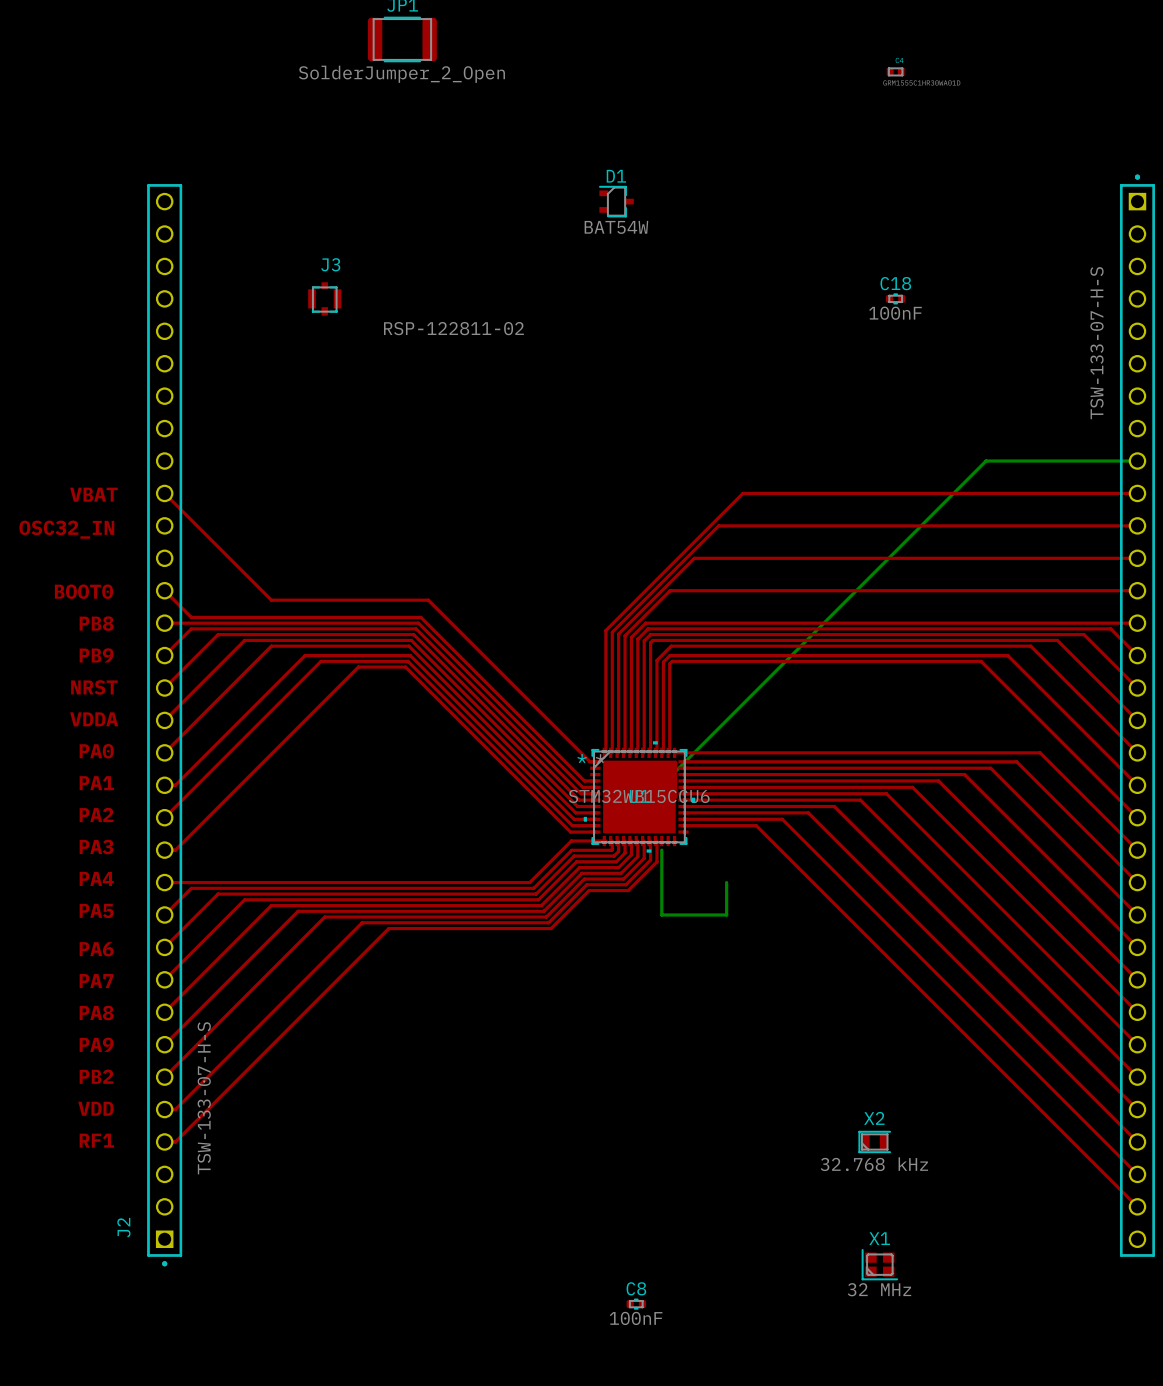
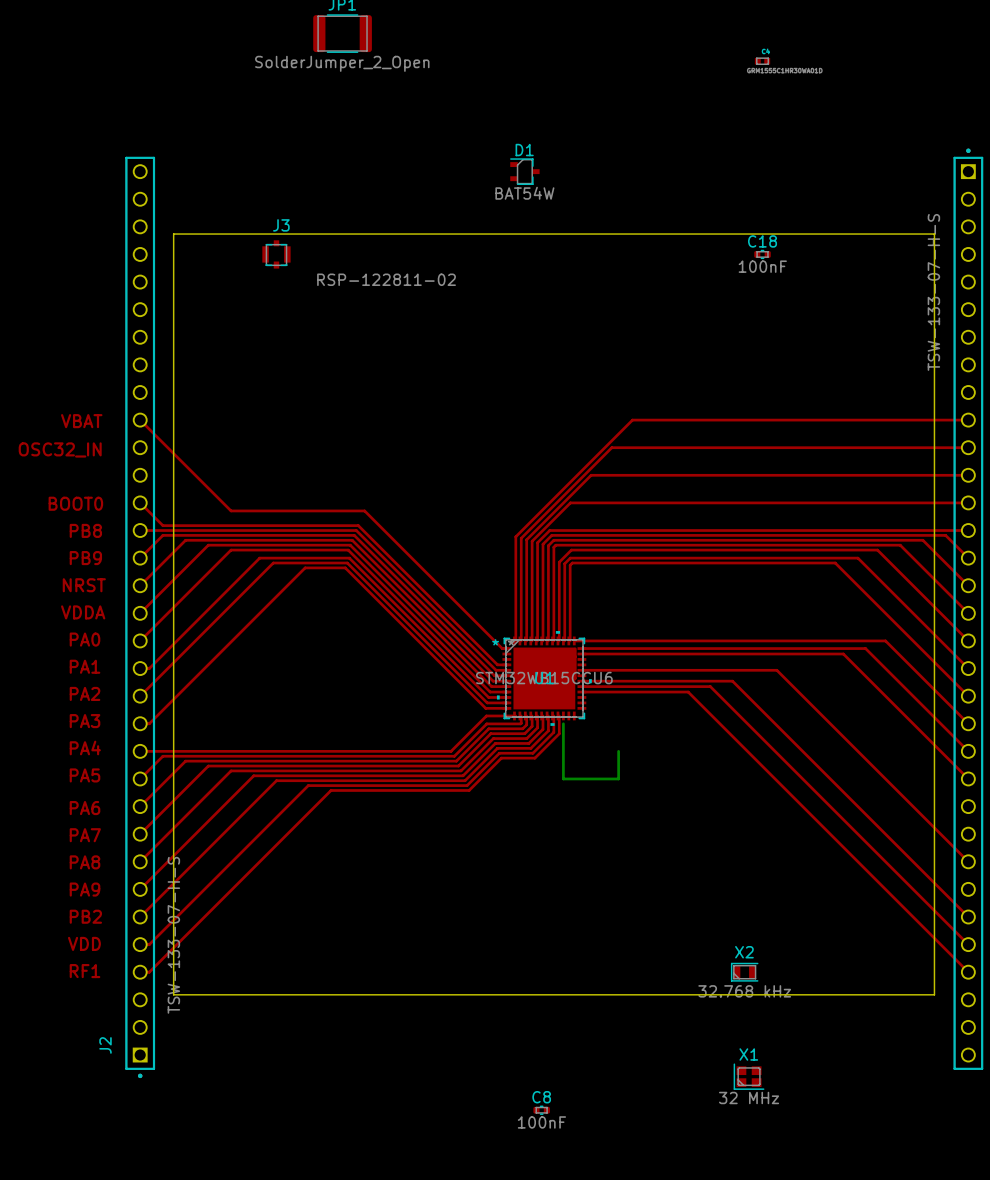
board edge: none -> (173, 234) (934, 234) (934, 994) (173, 994) (173, 234)
bottom track: (1137, 461) (986, 461) (661, 785) -> none
top track: (685, 774) (964, 774) (1137, 947) -> none
top track: (685, 780) (938, 780) (1137, 979) -> none
top track: (685, 793) (886, 793) (1137, 1044) -> none
top track: (685, 819) (782, 819) (1137, 1174) -> none
top track: (685, 825) (756, 825) (1137, 1206) -> none

